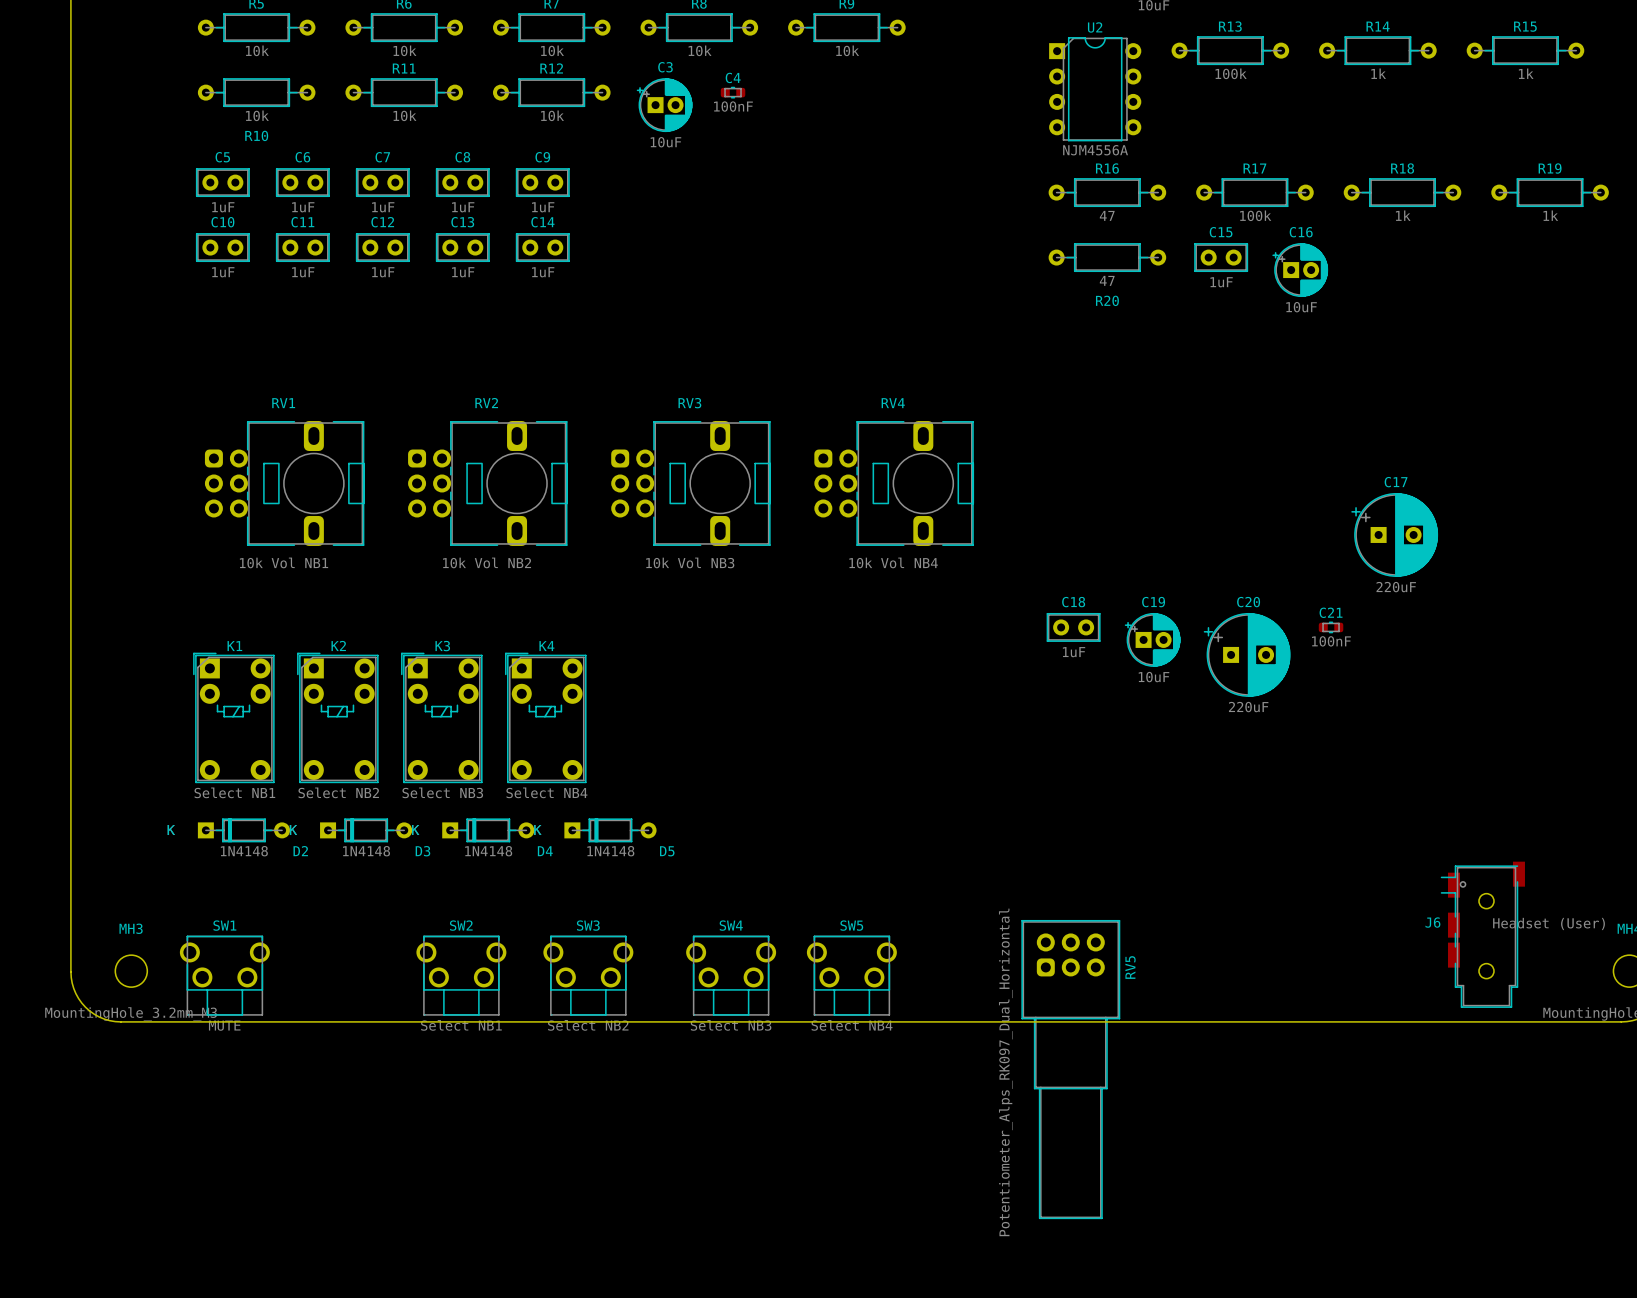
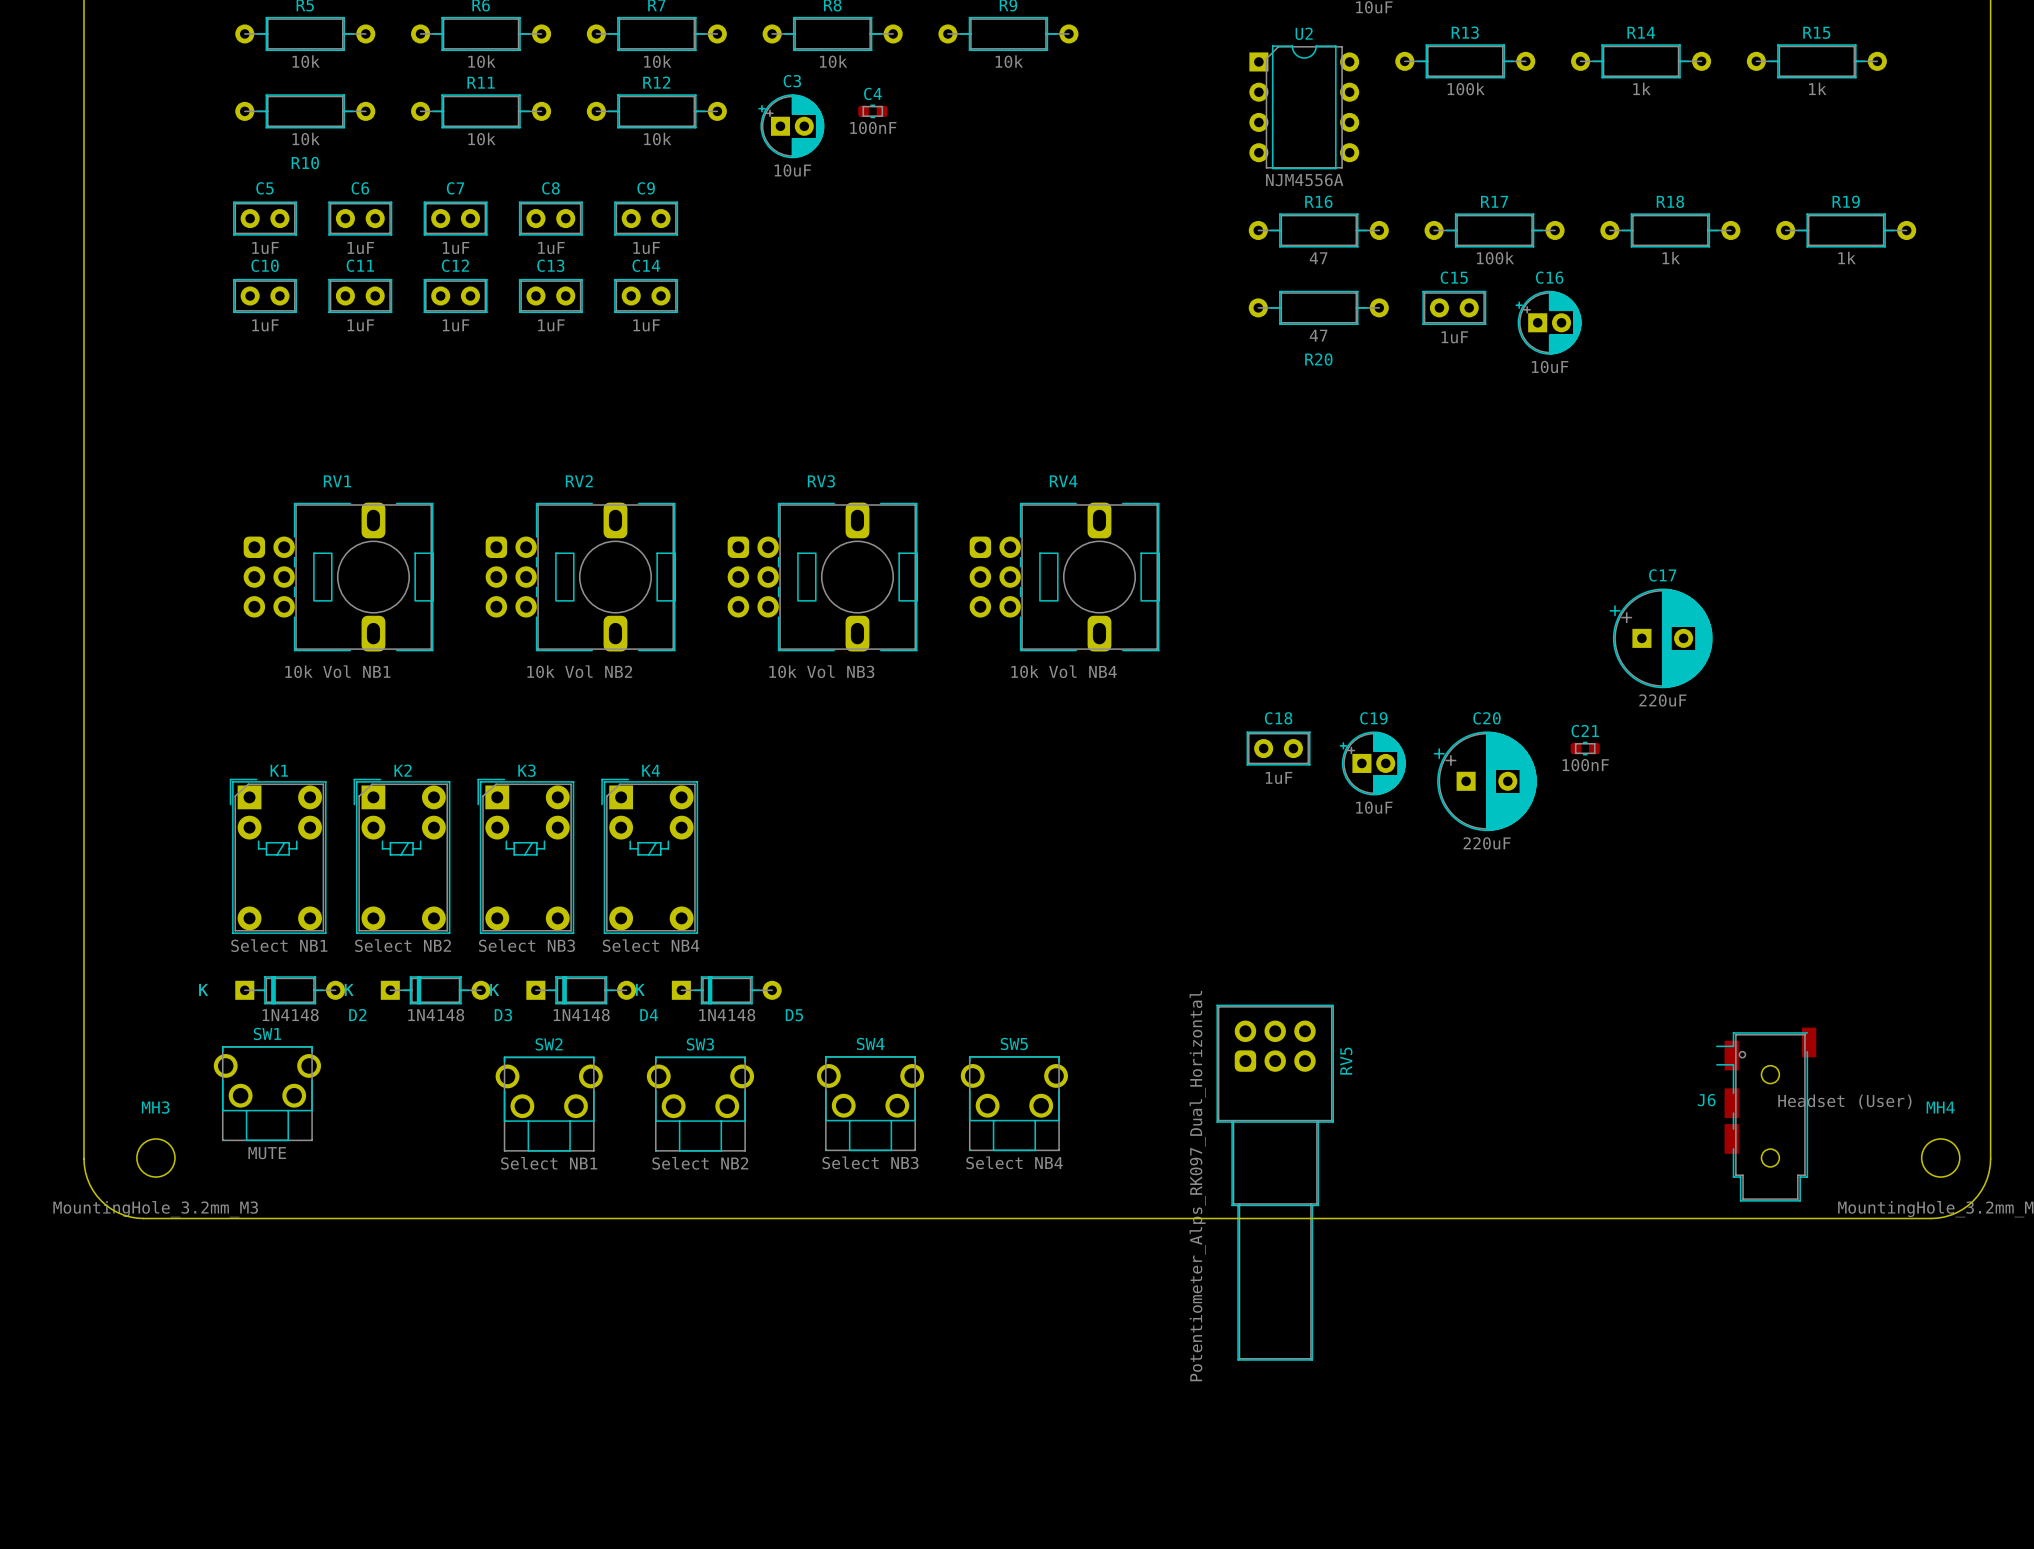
SW1 position: (224, 975) -> (267, 1093)
SW2 position: (461, 975) -> (549, 1104)
SW3 position: (588, 975) -> (700, 1104)
SW4 position: (731, 975) -> (870, 1103)
SW5 position: (851, 975) -> (1014, 1103)
RV5 position: (1070, 1069) -> (1275, 1182)

